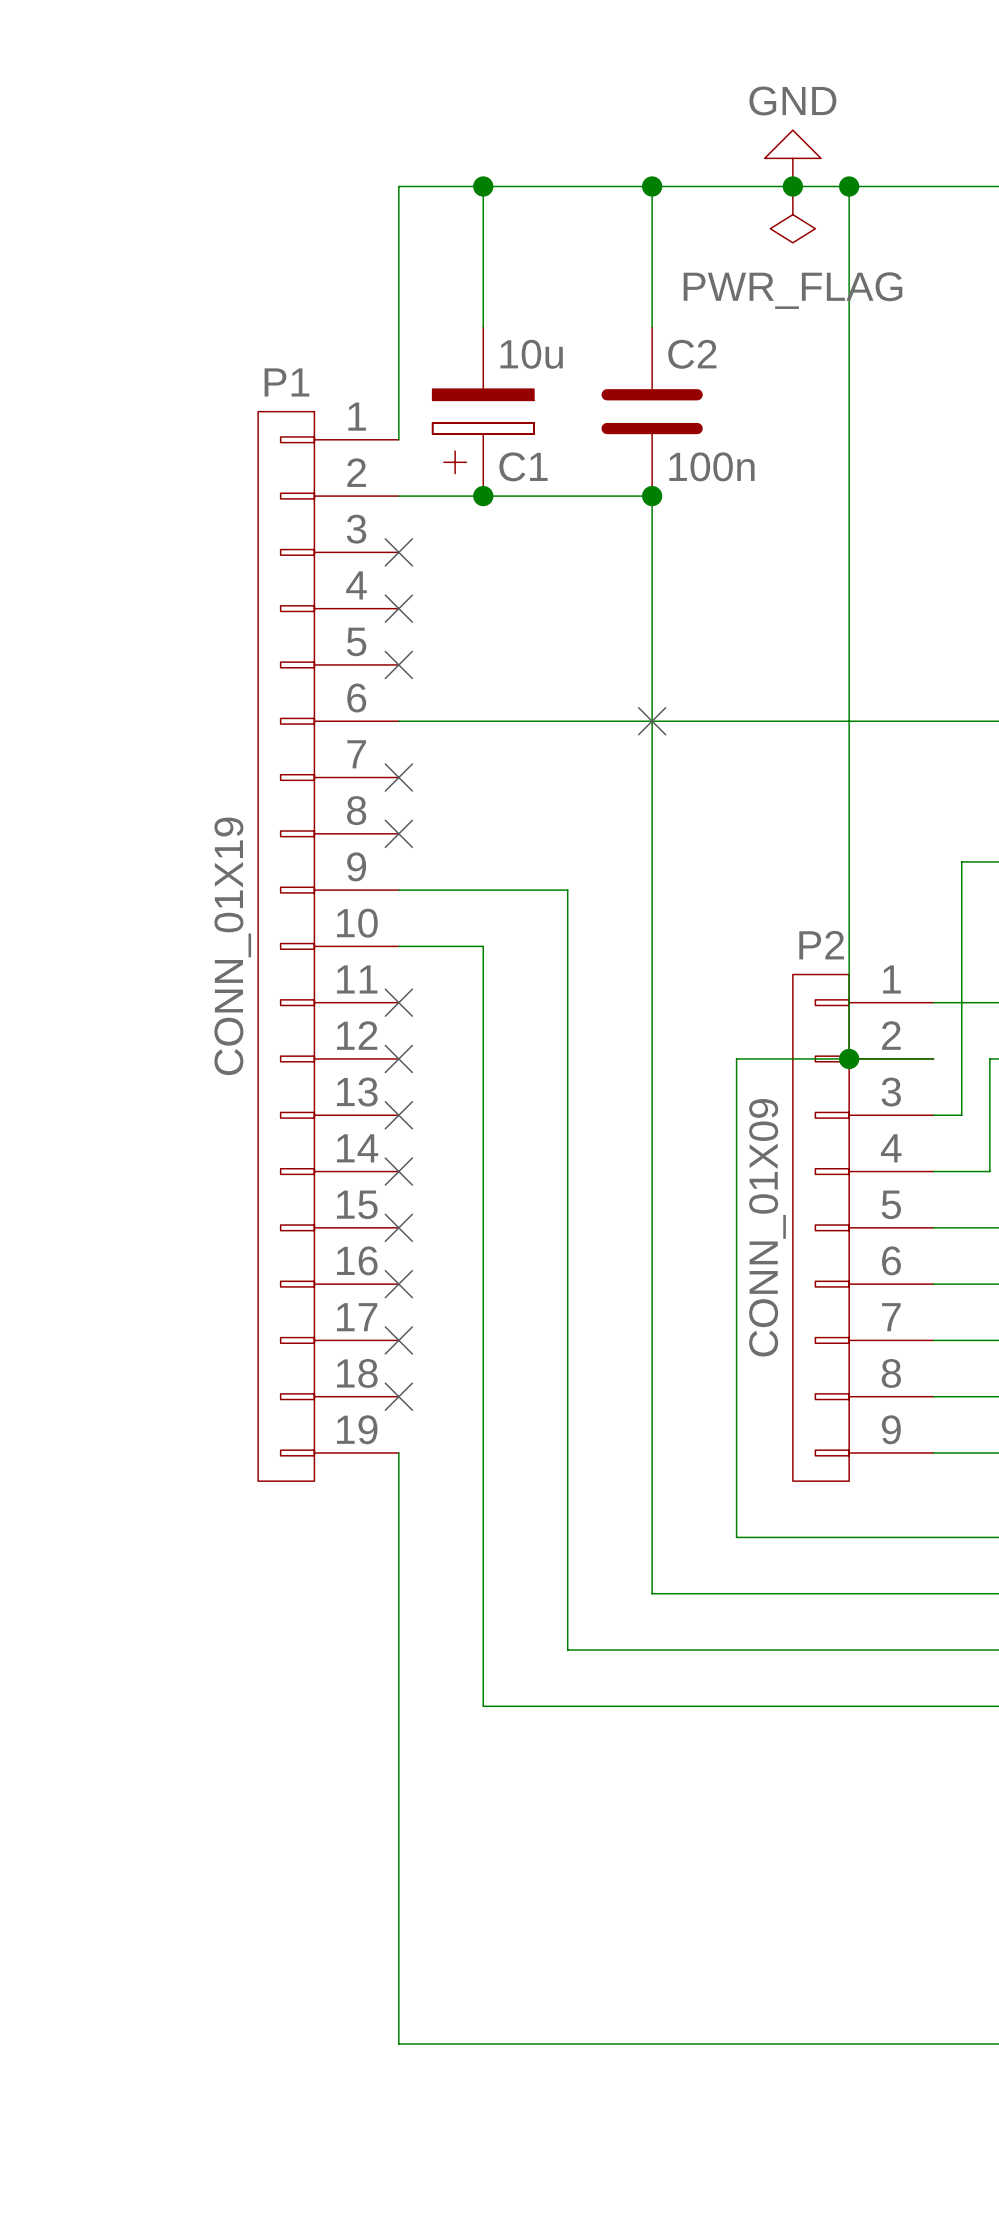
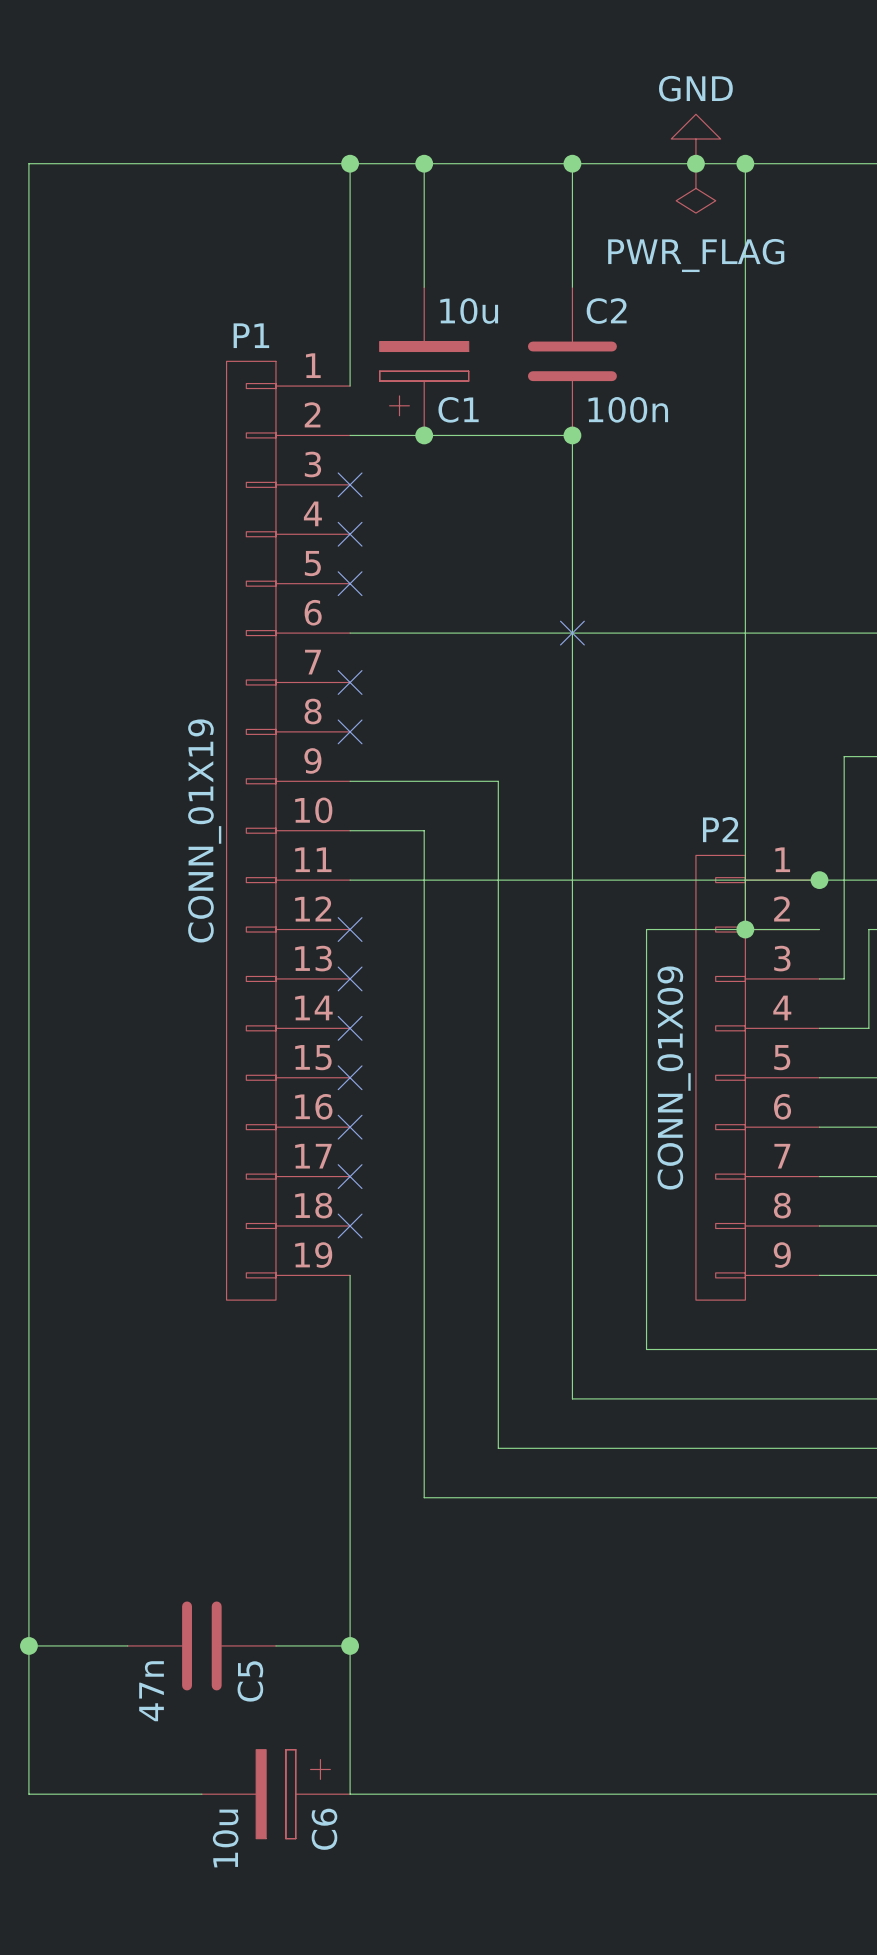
wire: none -> (350, 163) (28, 163) (28, 1794) (201, 1794)
junction: none -> (350, 163)
wire: none -> (350, 880) (819, 880)
no-connect mark: (398, 1002) -> none
junction: none -> (819, 880)
wire: none -> (28, 1645) (127, 1645)
junction: none -> (28, 1645)
C5: none -> 47n (201, 1645)
wire: none -> (275, 1645) (350, 1645)
junction: none -> (350, 1645)
C6: none -> 10u (275, 1794)

